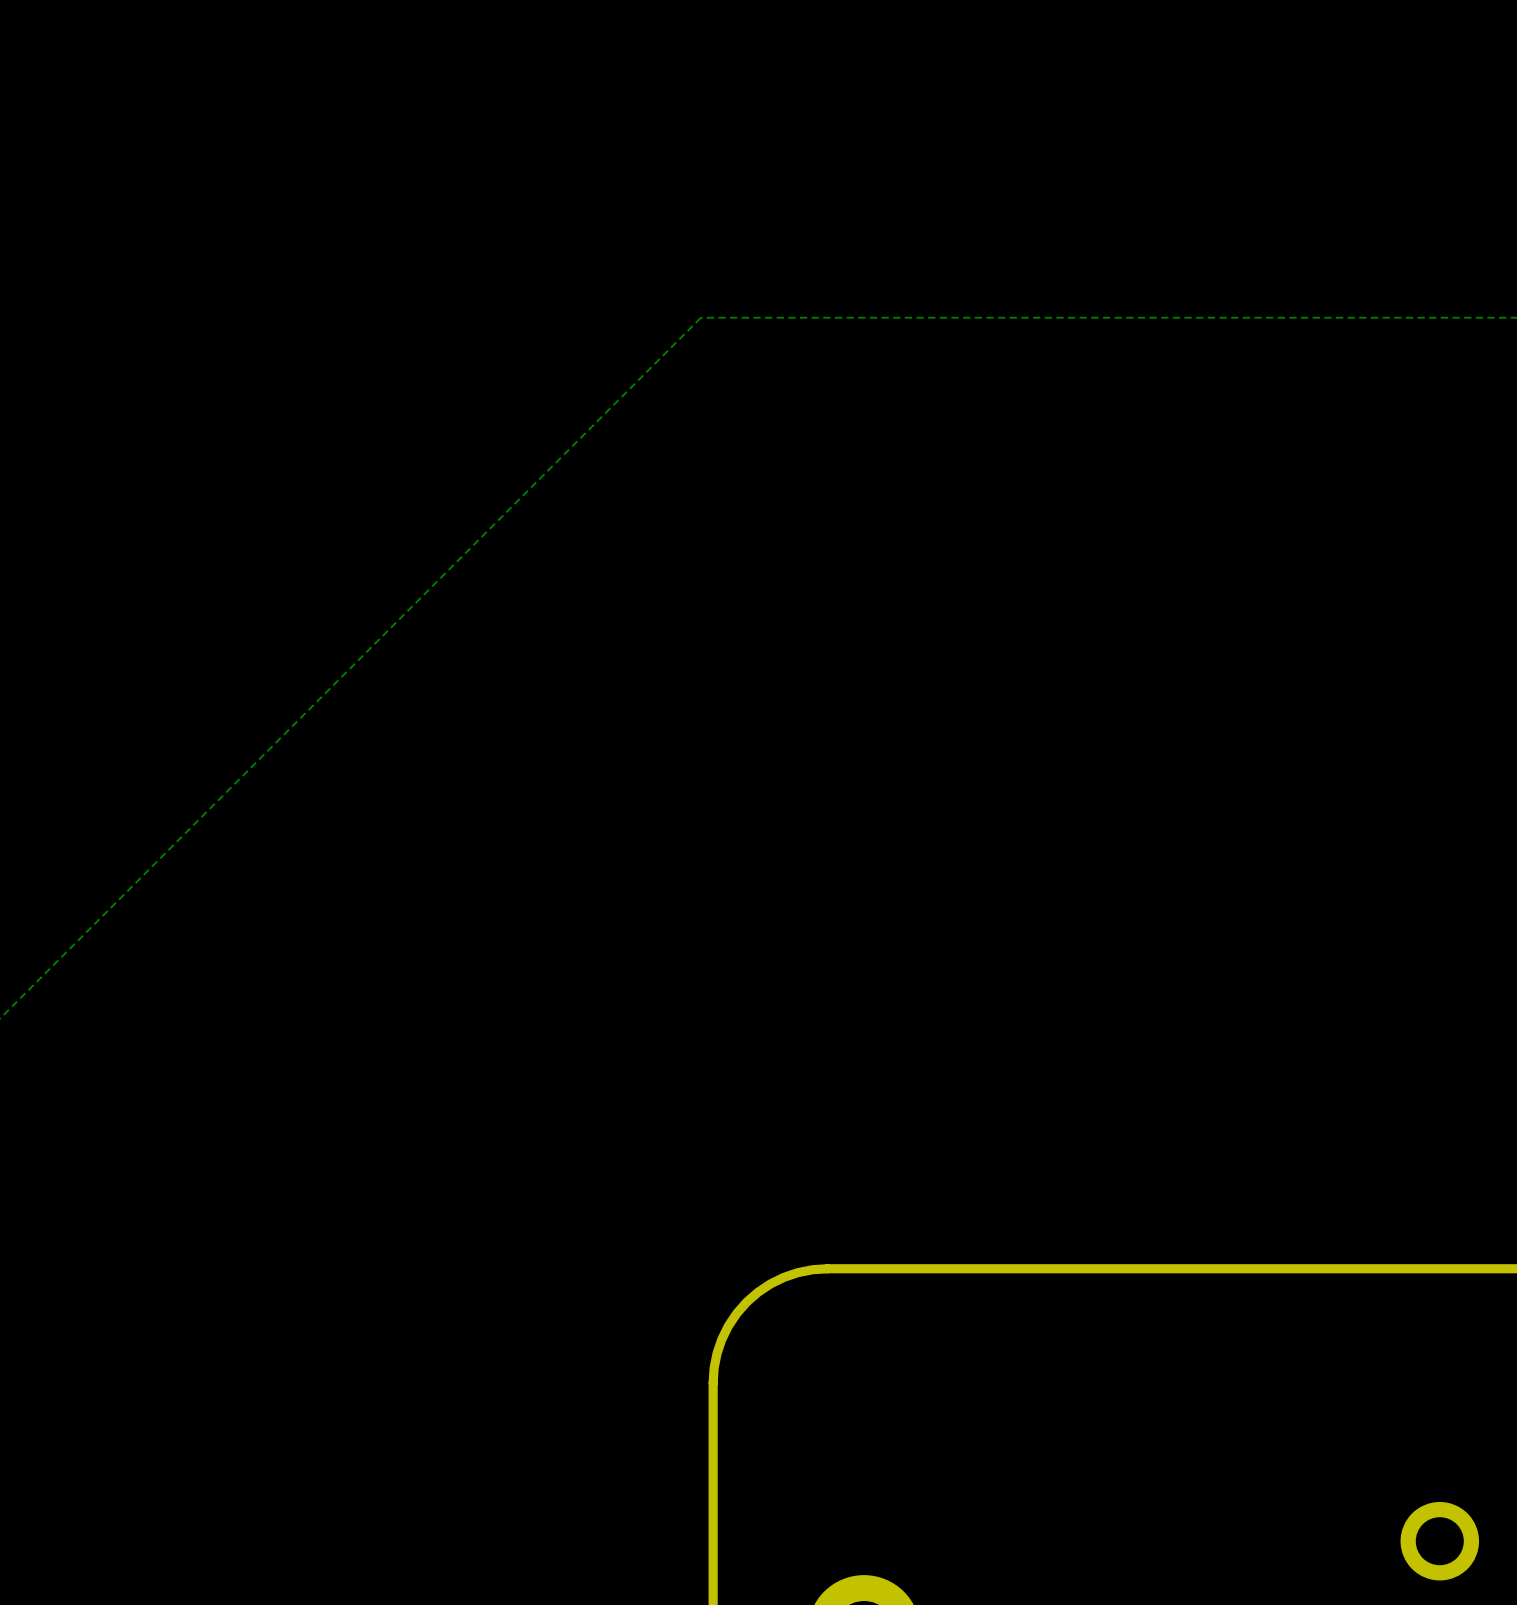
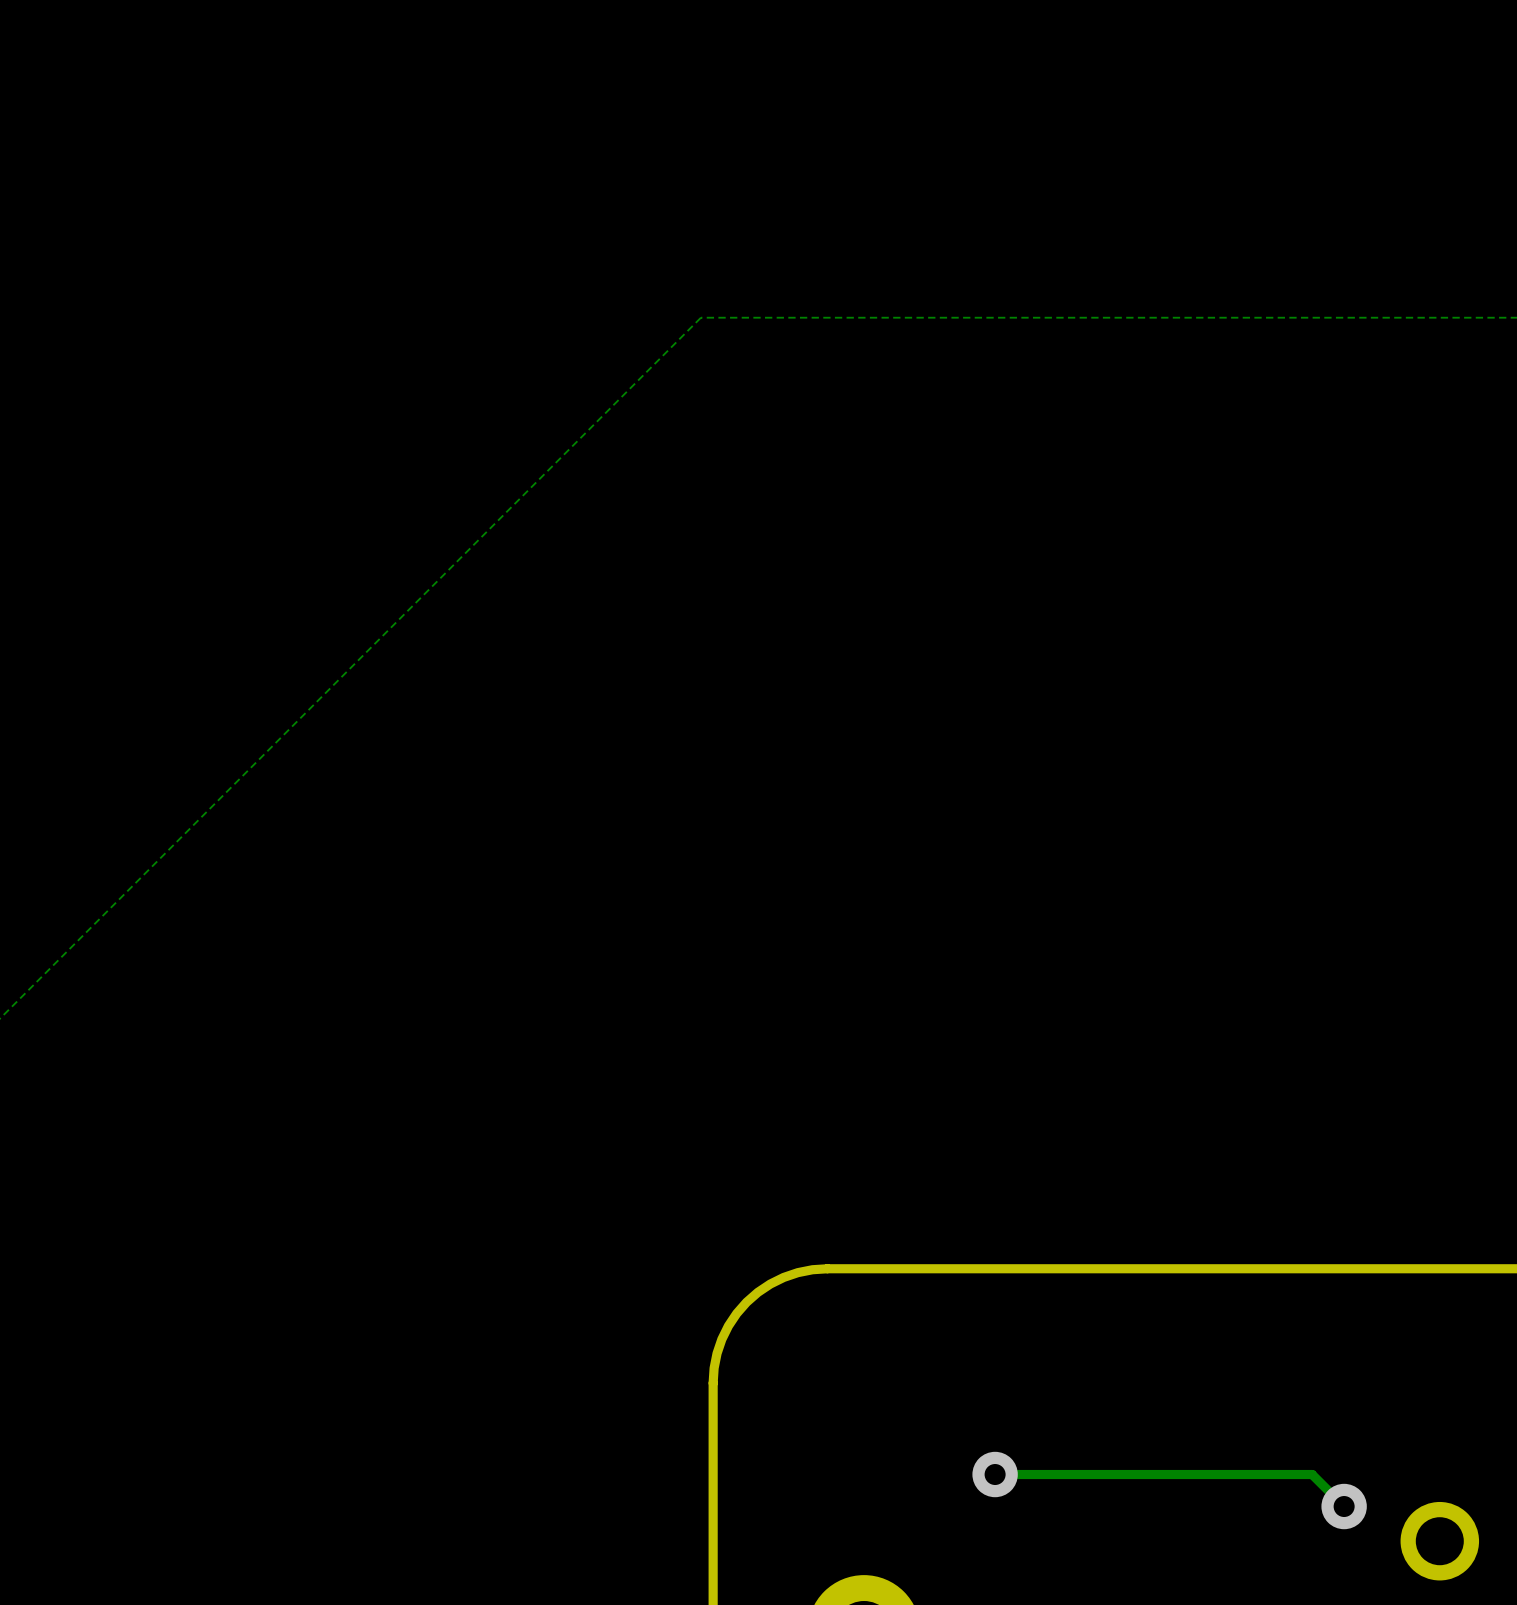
track: none -> (995, 1474) (1312, 1474) (1344, 1506)
via: none -> (995, 1474)
via: none -> (1344, 1506)

